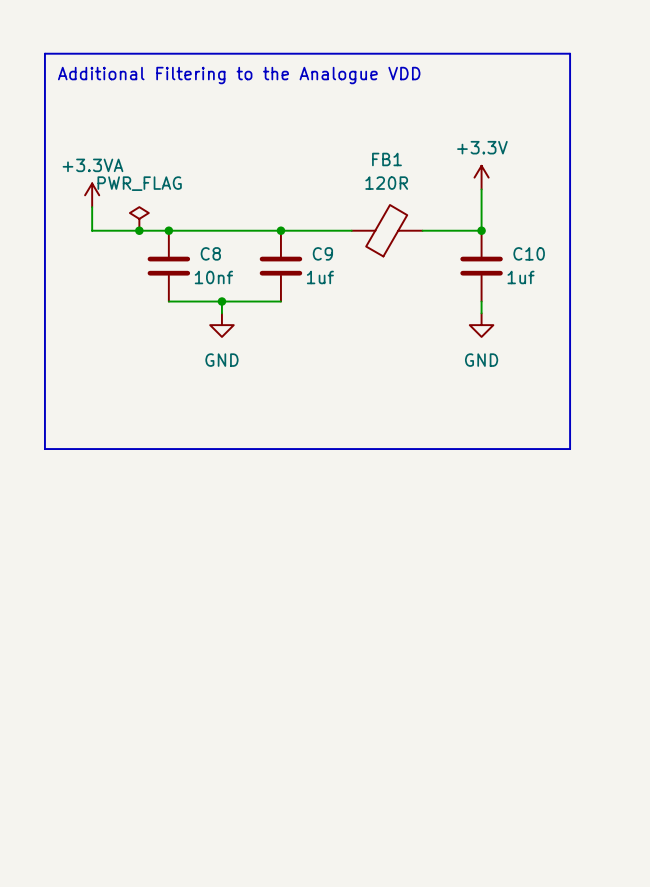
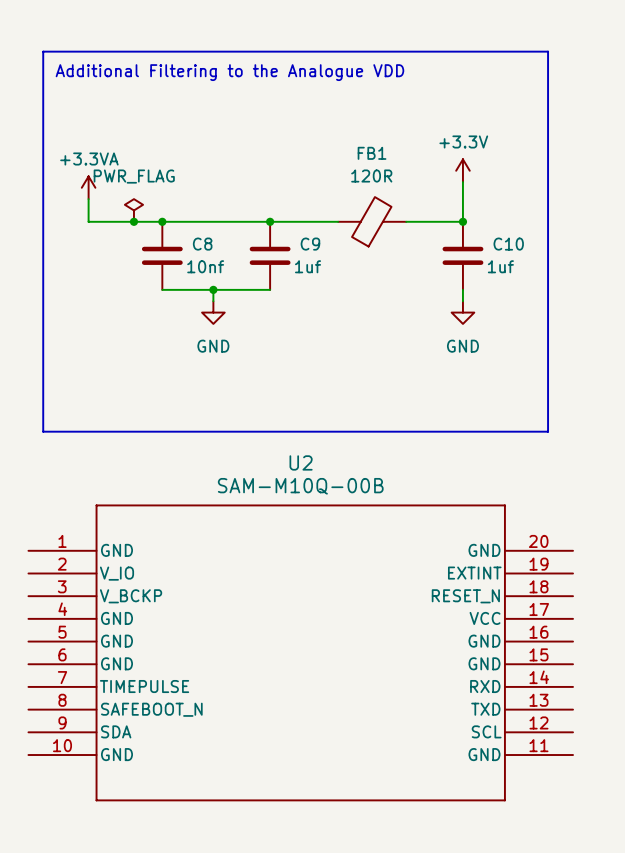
U2: none -> SAM-M10Q-00B (300, 652)

